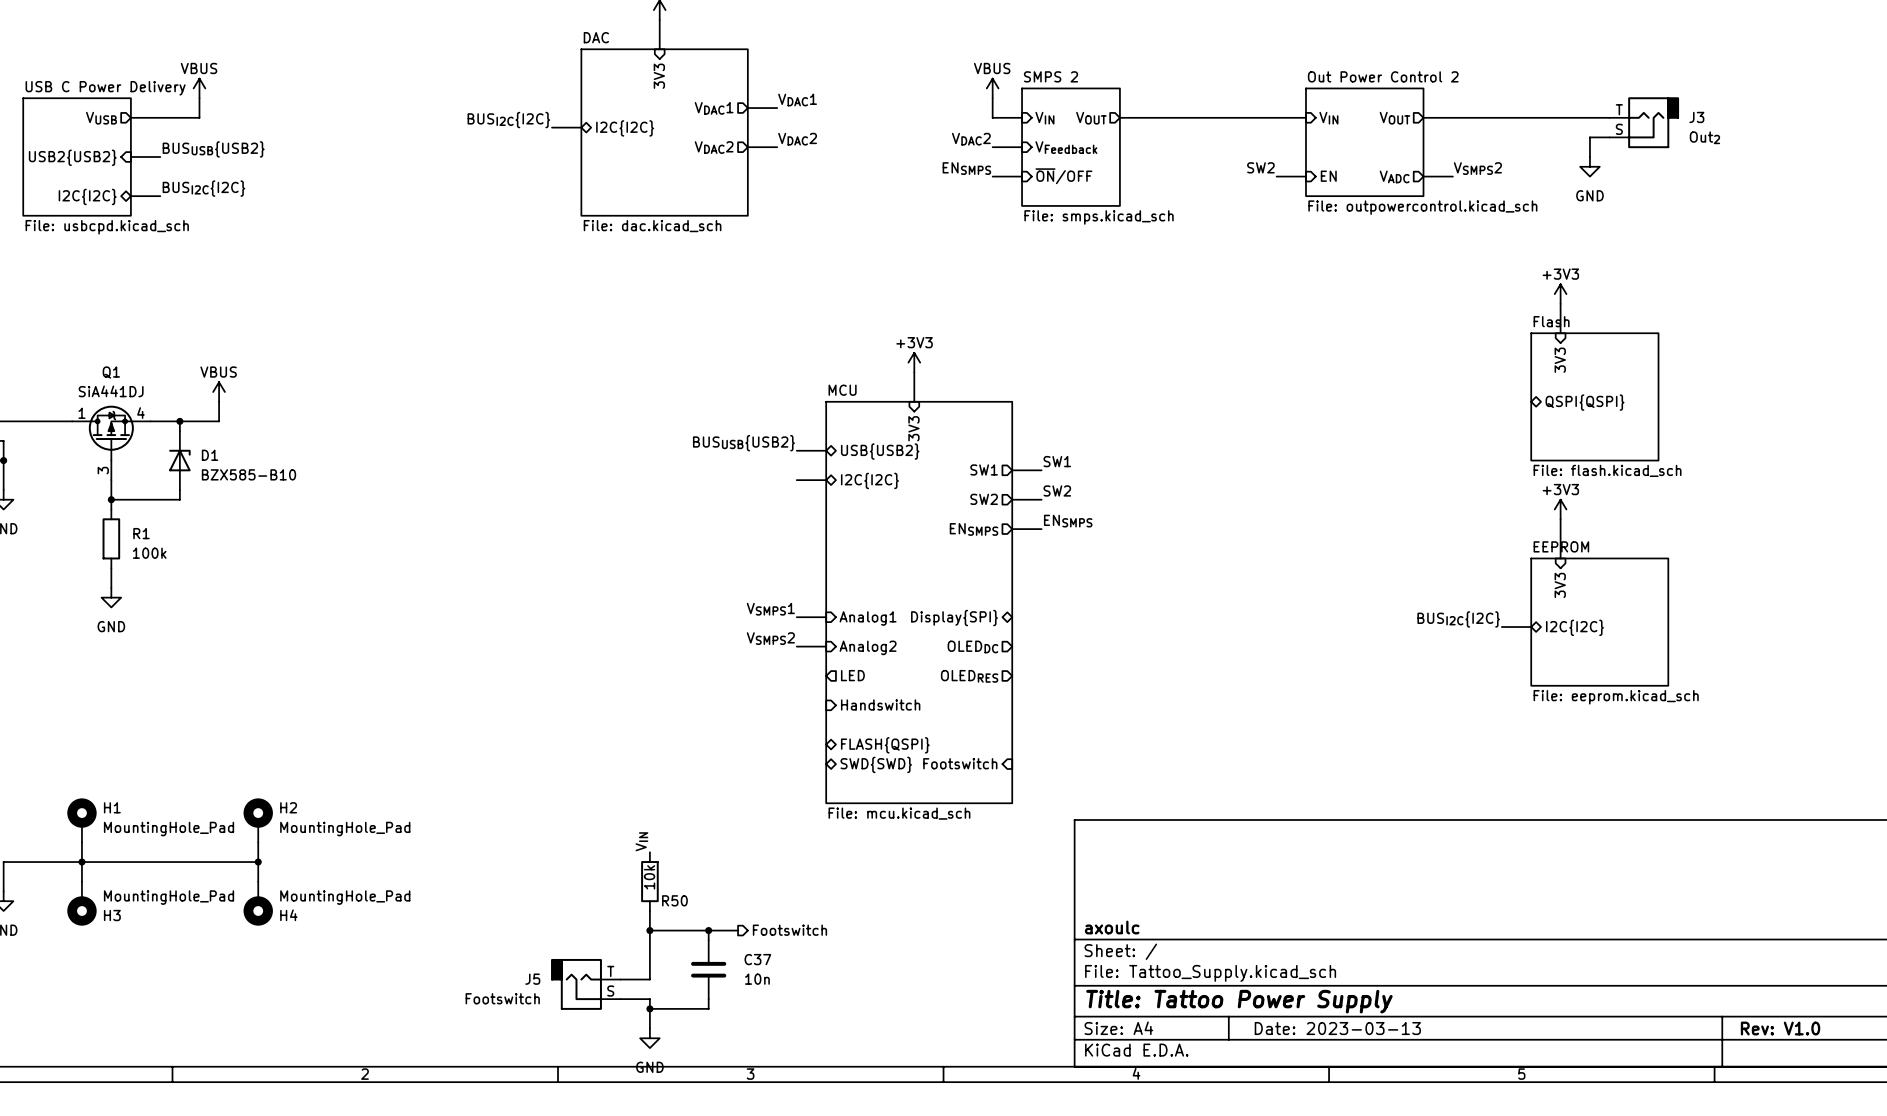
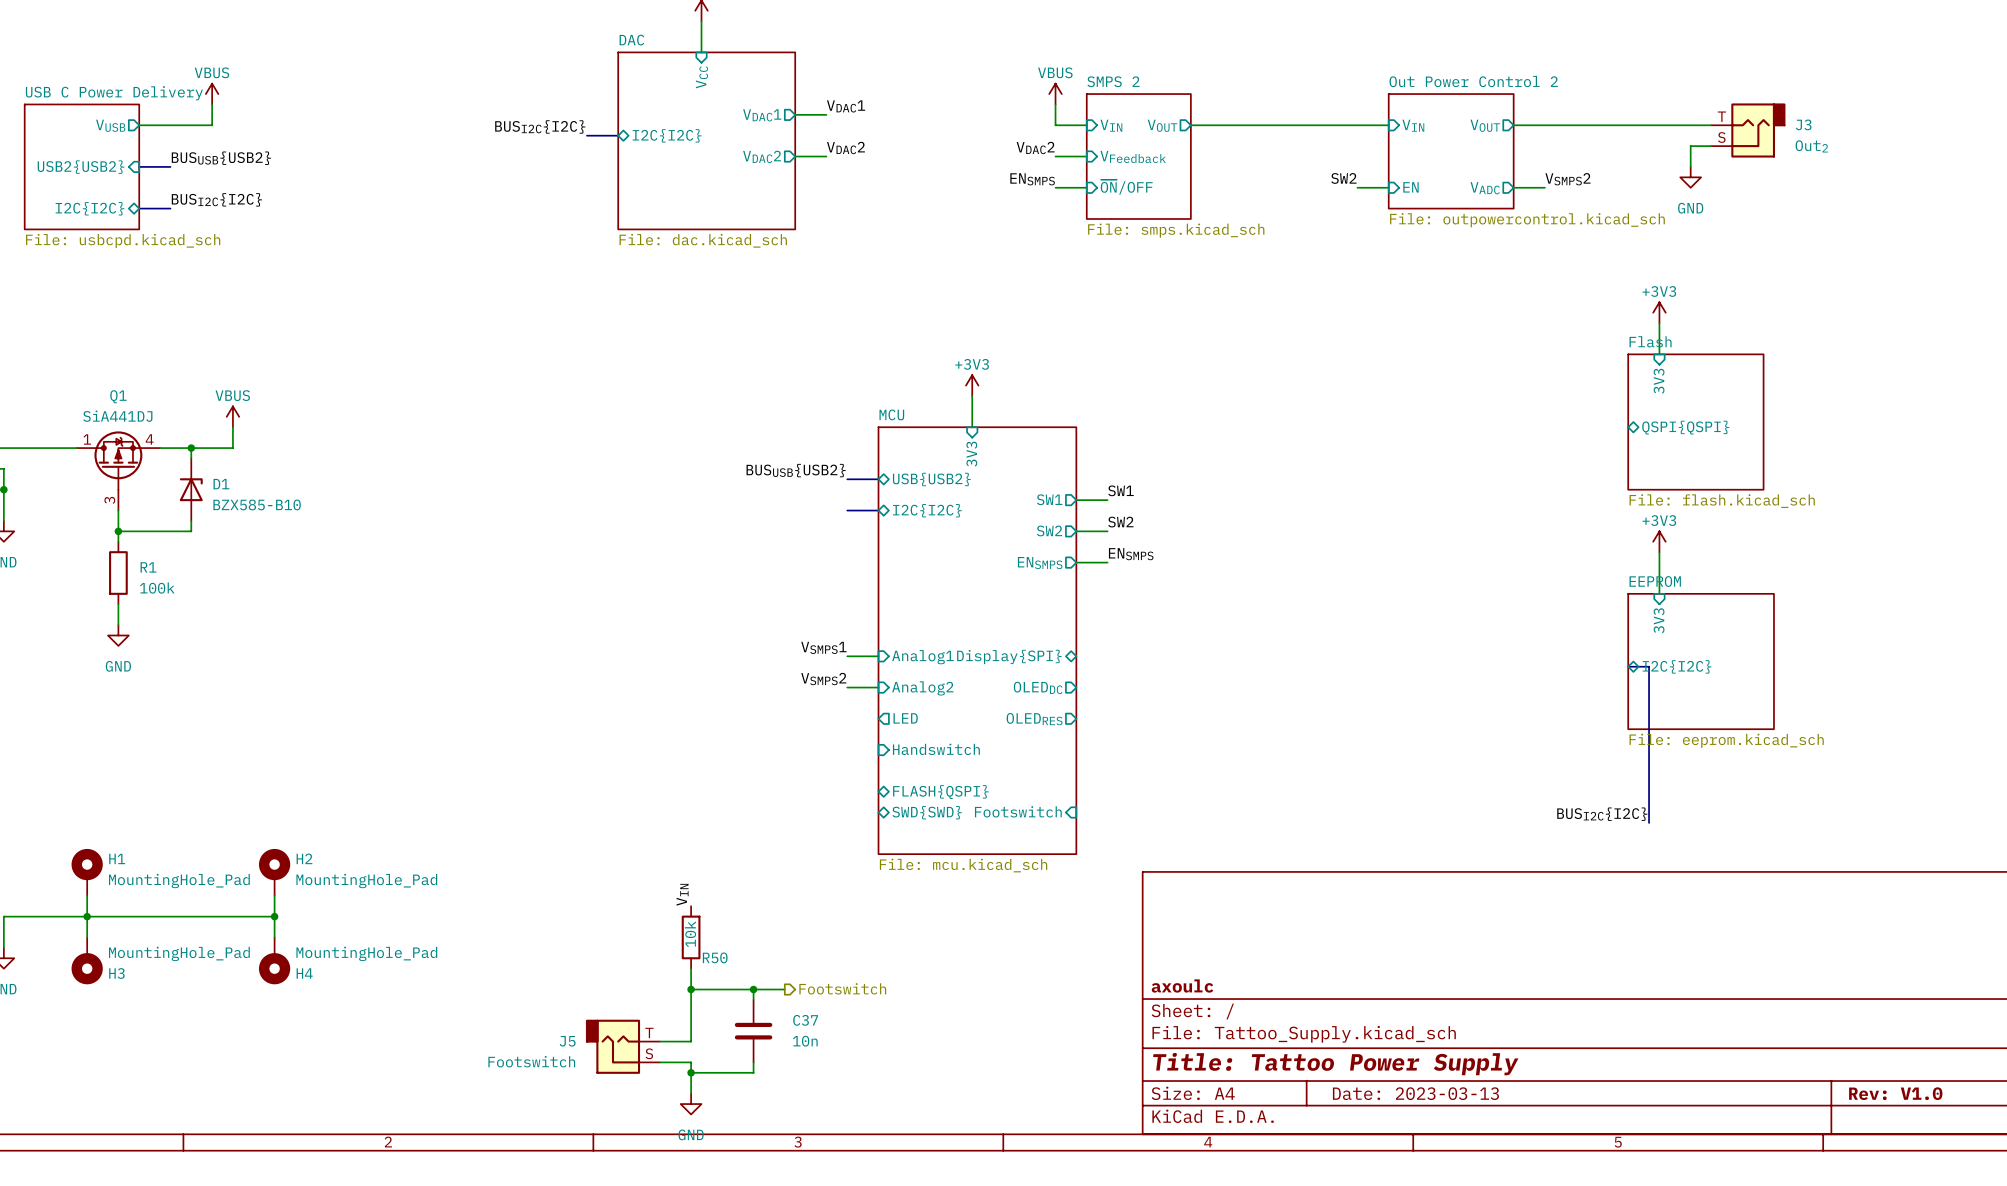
sheet pin: 3V3 (659, 76) -> VCC (701, 77)
label position: BUSI2C{I2C} (1458, 619) -> BUSI2C{I2C} (1602, 814)
bus: (1501, 627) (1531, 627) -> (1649, 822) (1649, 666) (1628, 666)

